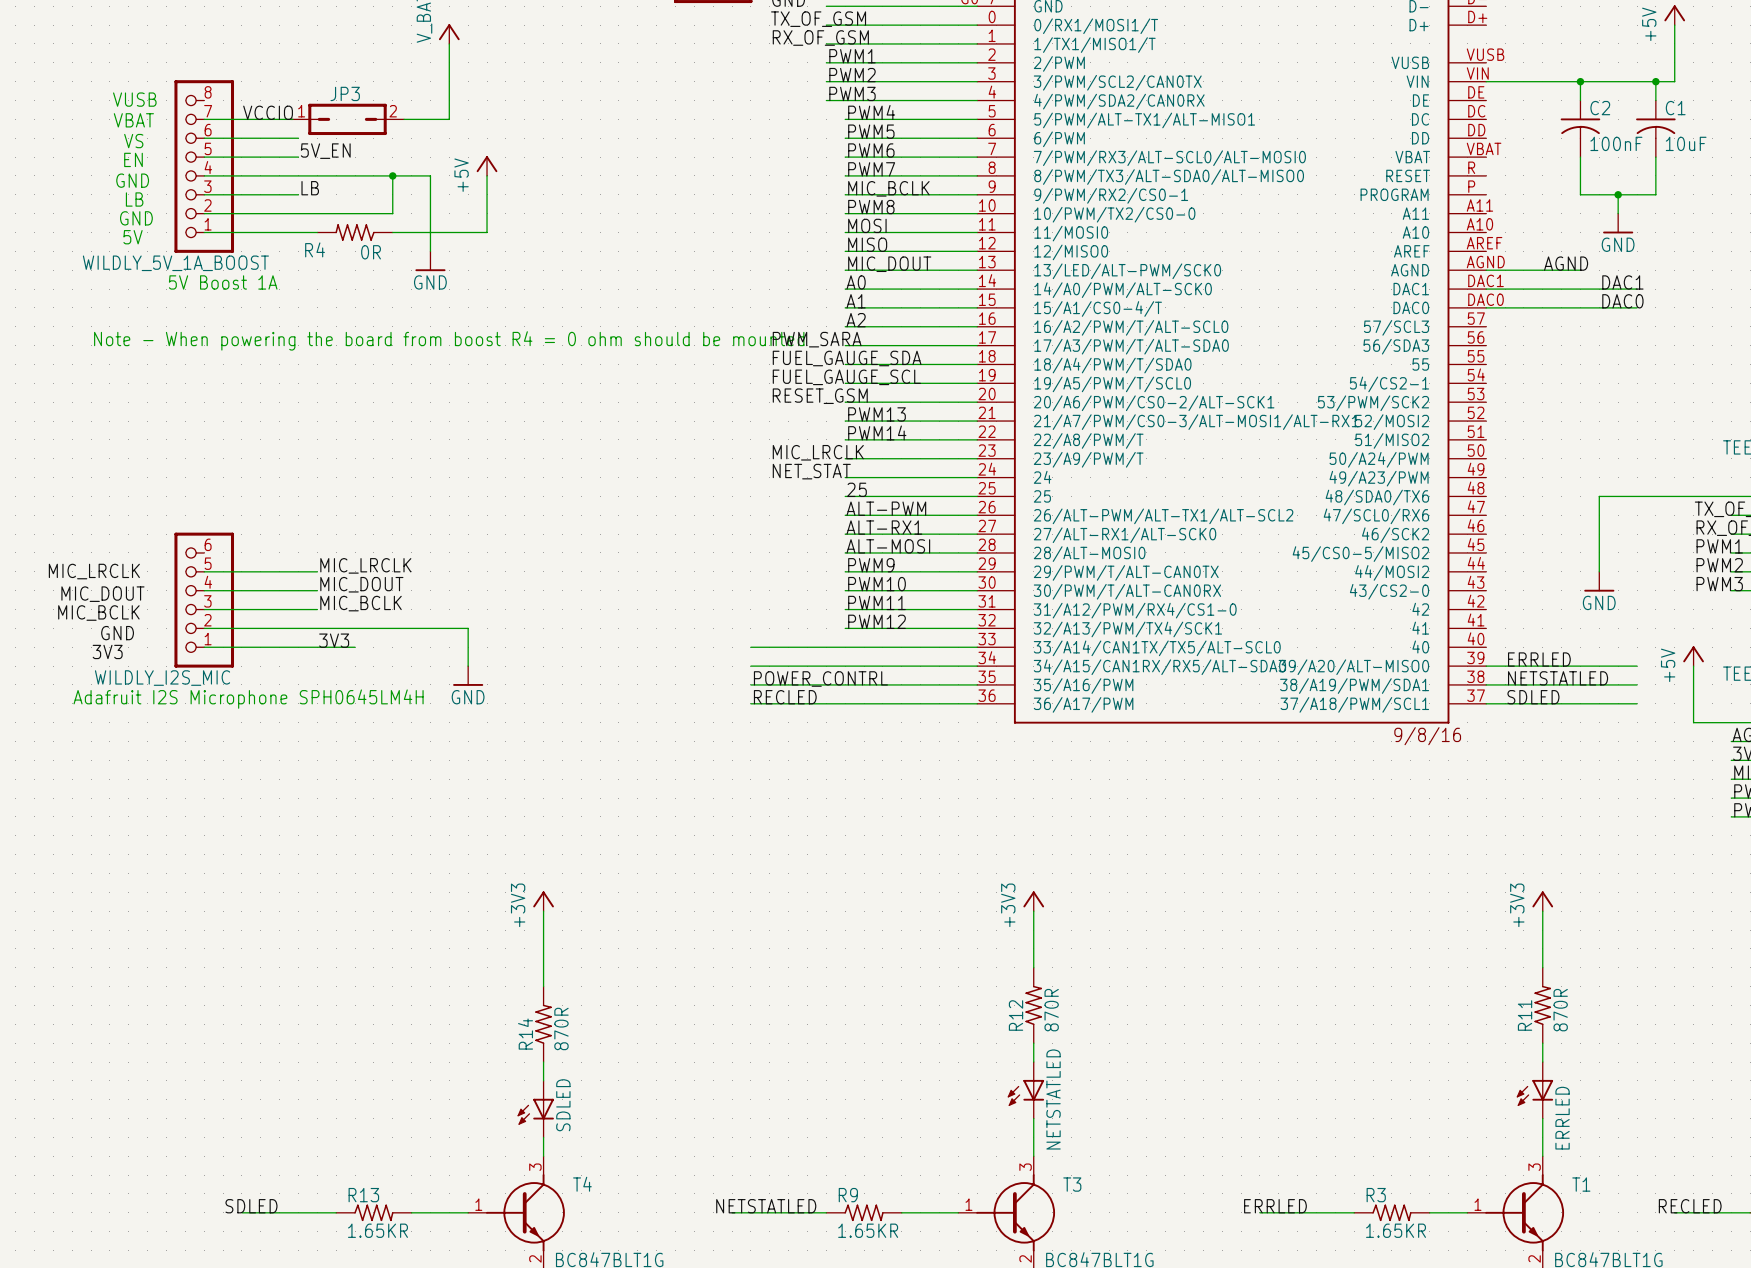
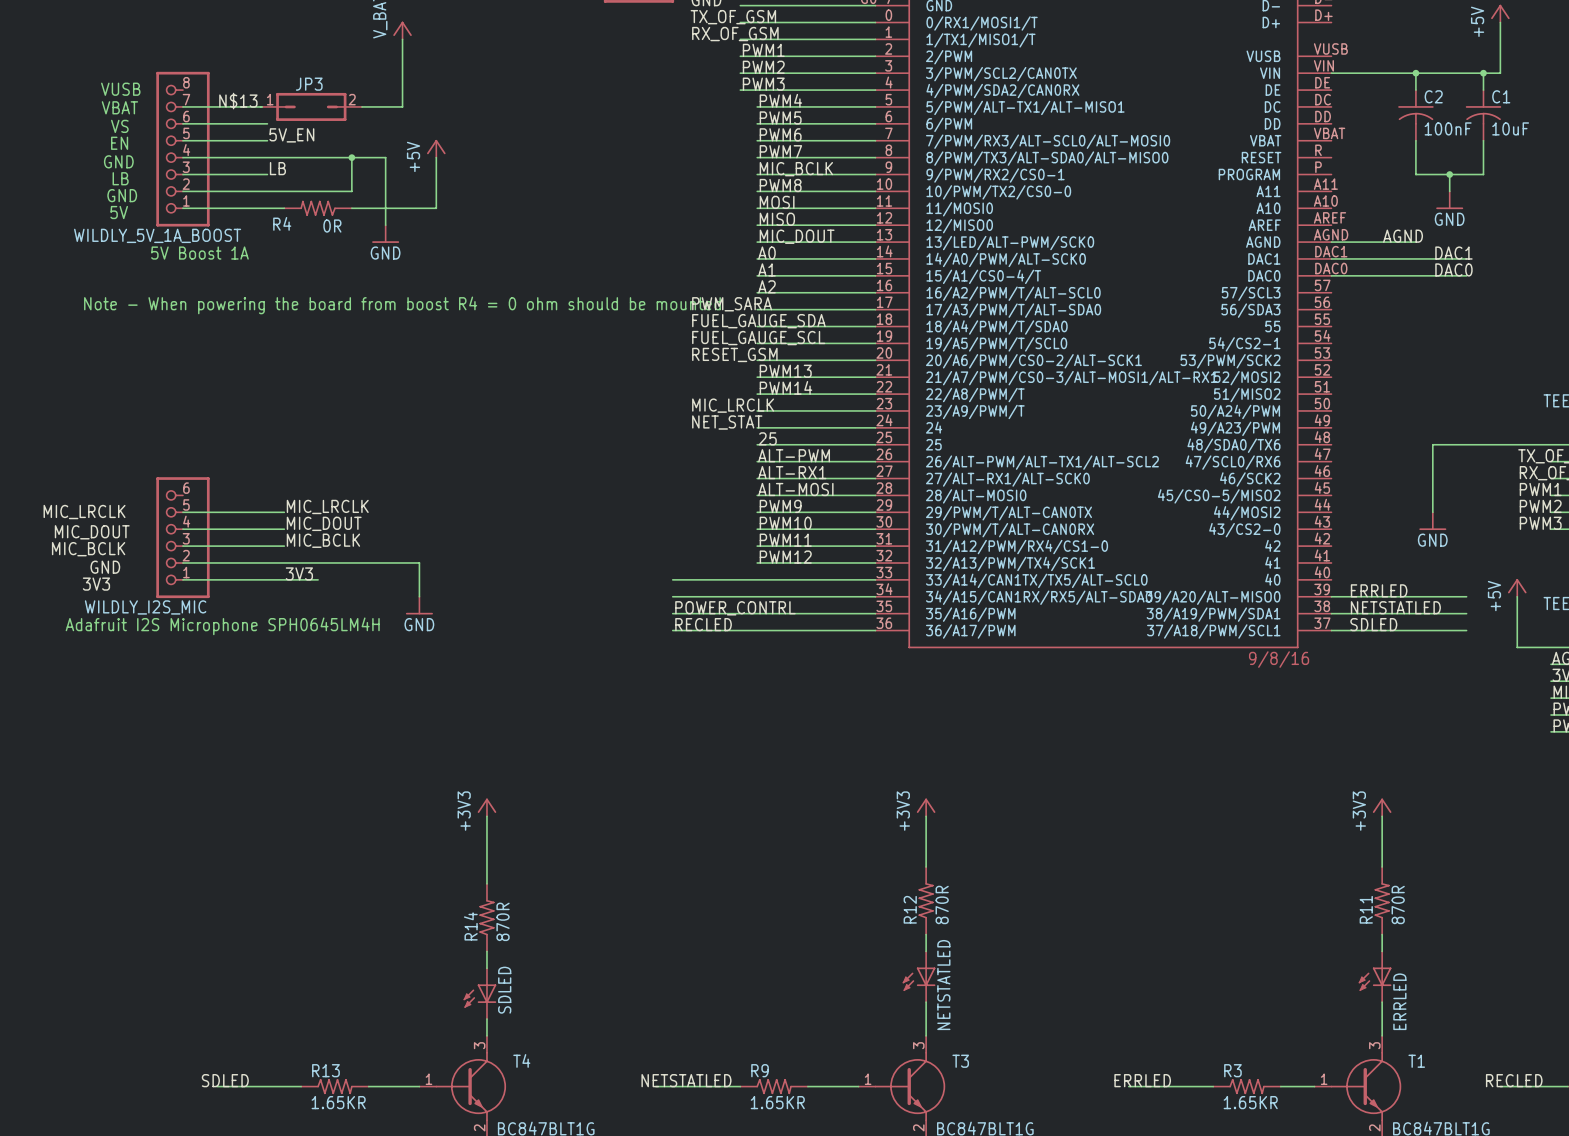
label: VCCIO (268, 112) -> N$13 (238, 101)

